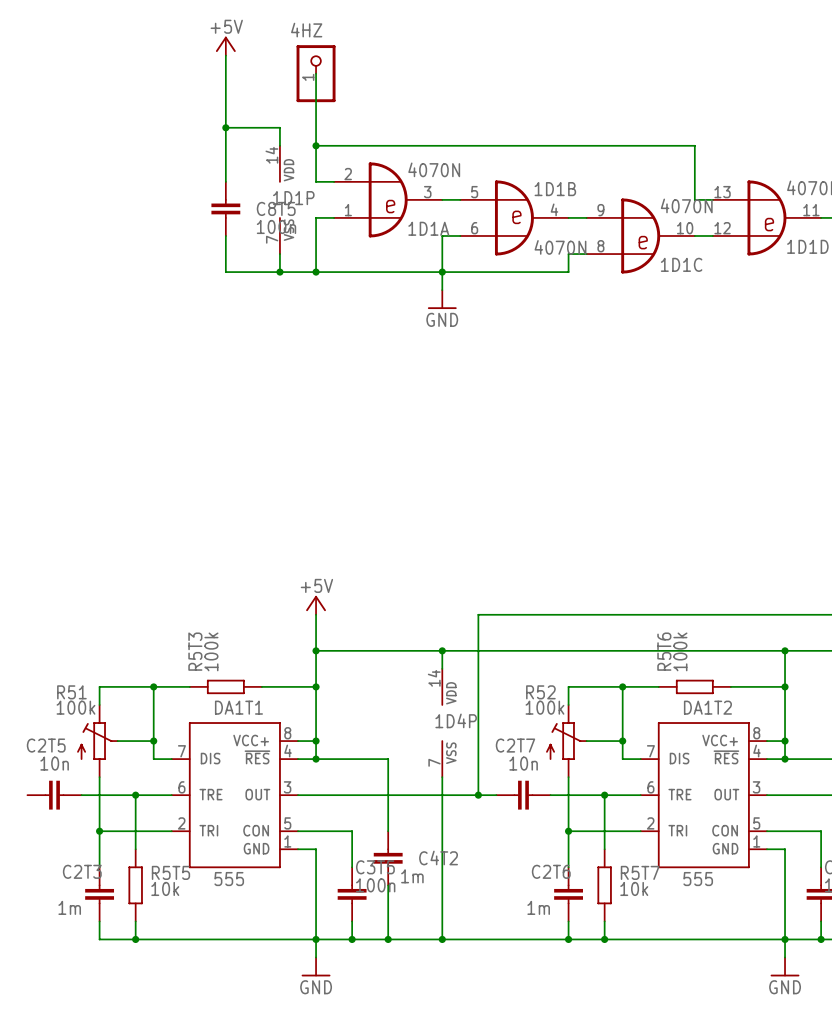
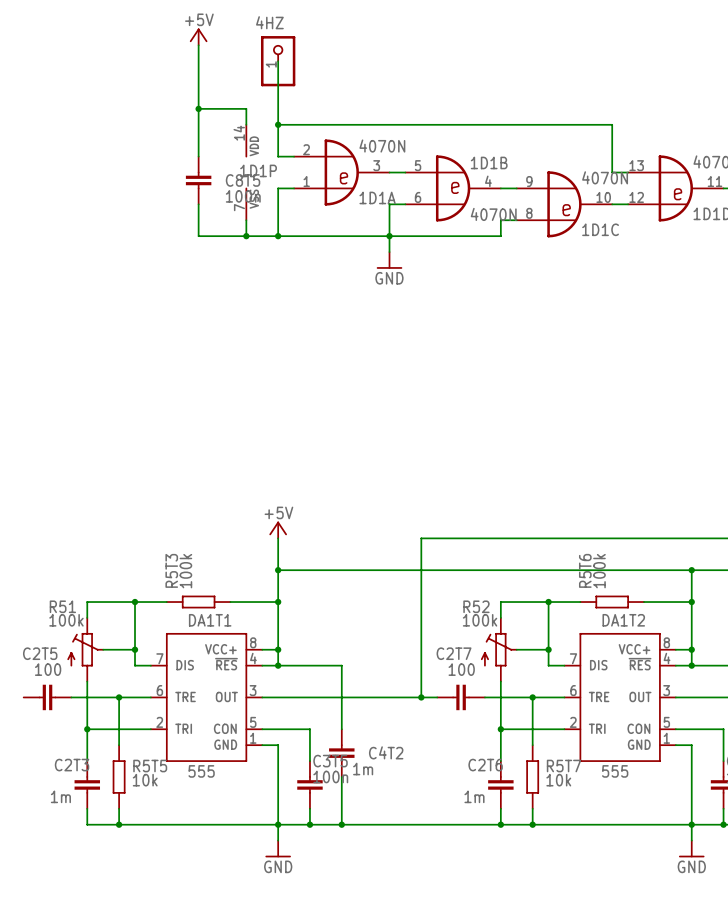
wire: (442, 650) (442, 668) -> none
junction: (442, 650) -> none
1D4P: (442, 723) -> none
C2T5 value: 10n (54, 763) -> 100 (48, 669)
C2T7 value: 10n (523, 763) -> 100 (461, 669)
wire: (442, 777) (442, 939) -> none
junction: (442, 939) -> none

